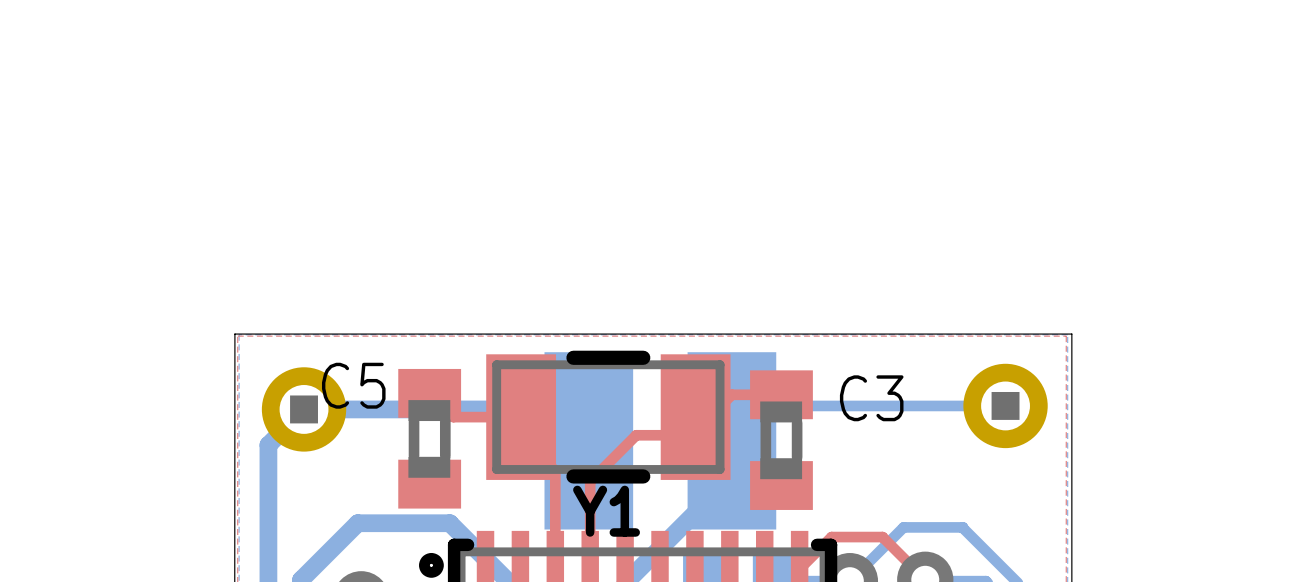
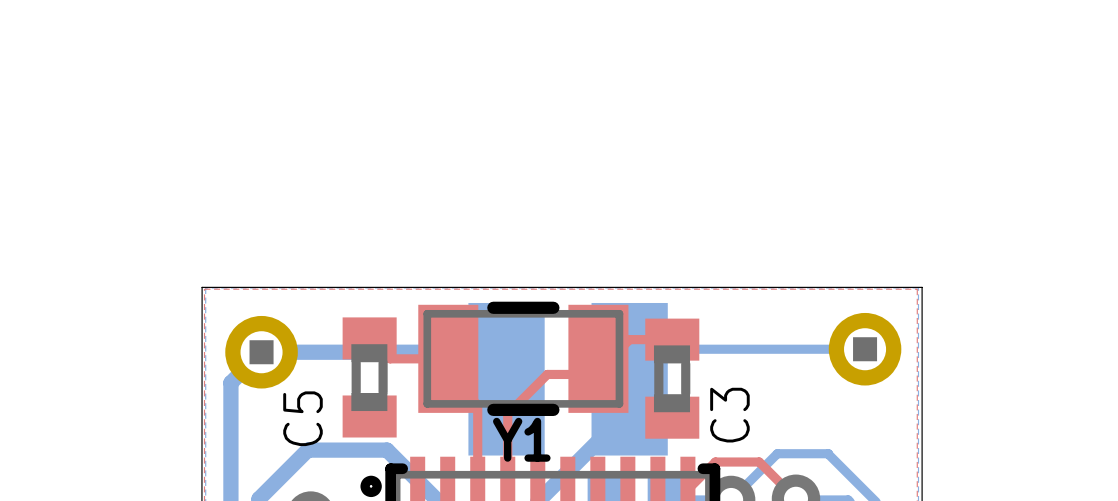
C5 name rotation: 0° (353, 385) -> 90° counterclockwise (302, 418)
C3 name rotation: 0° (871, 398) -> 90° counterclockwise (729, 415)

